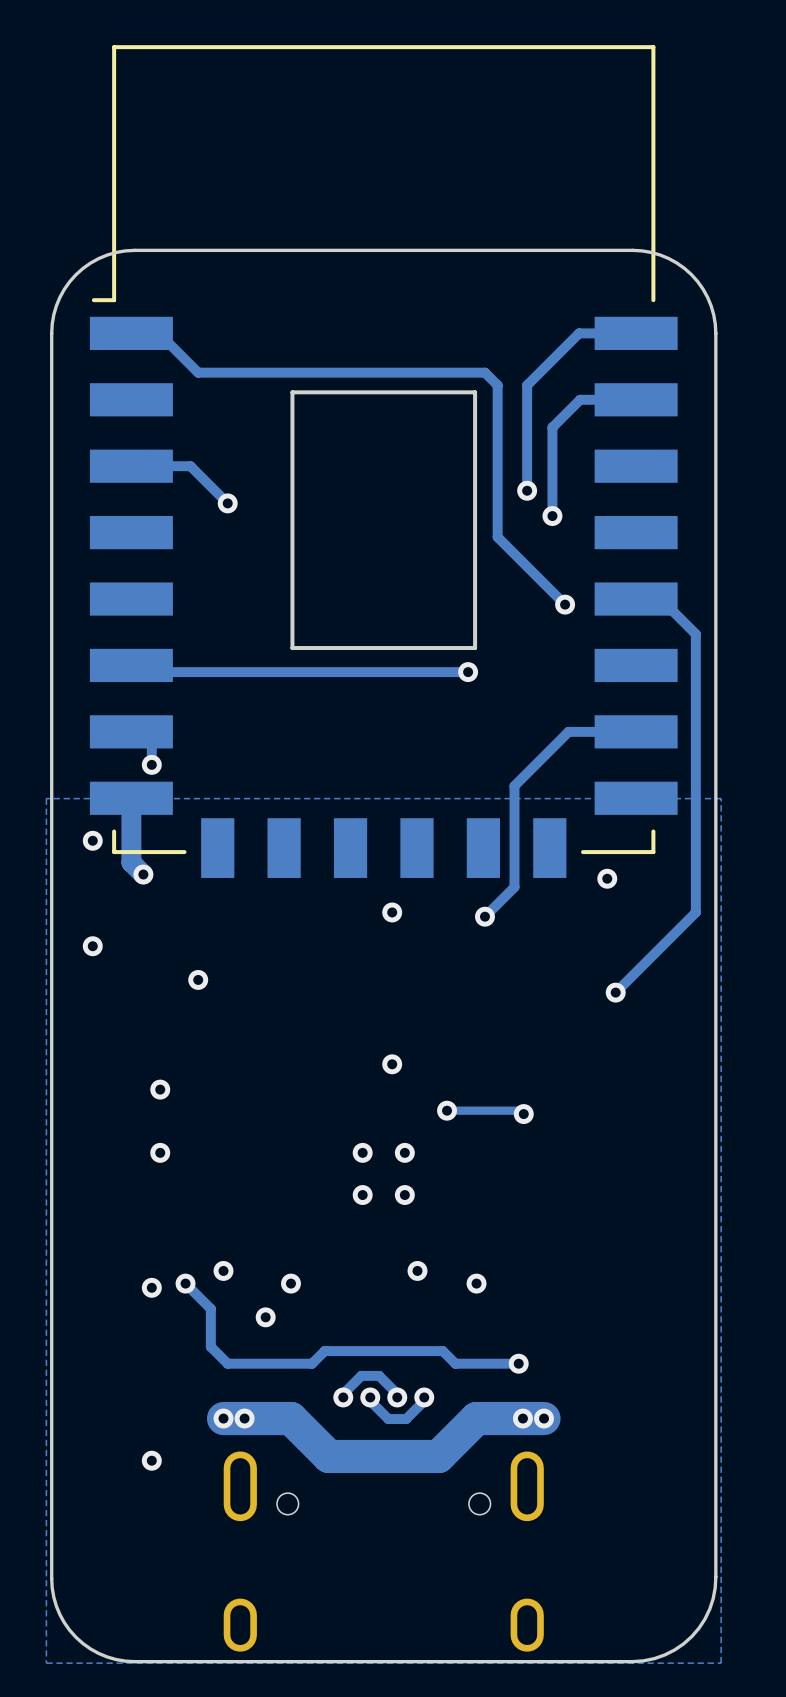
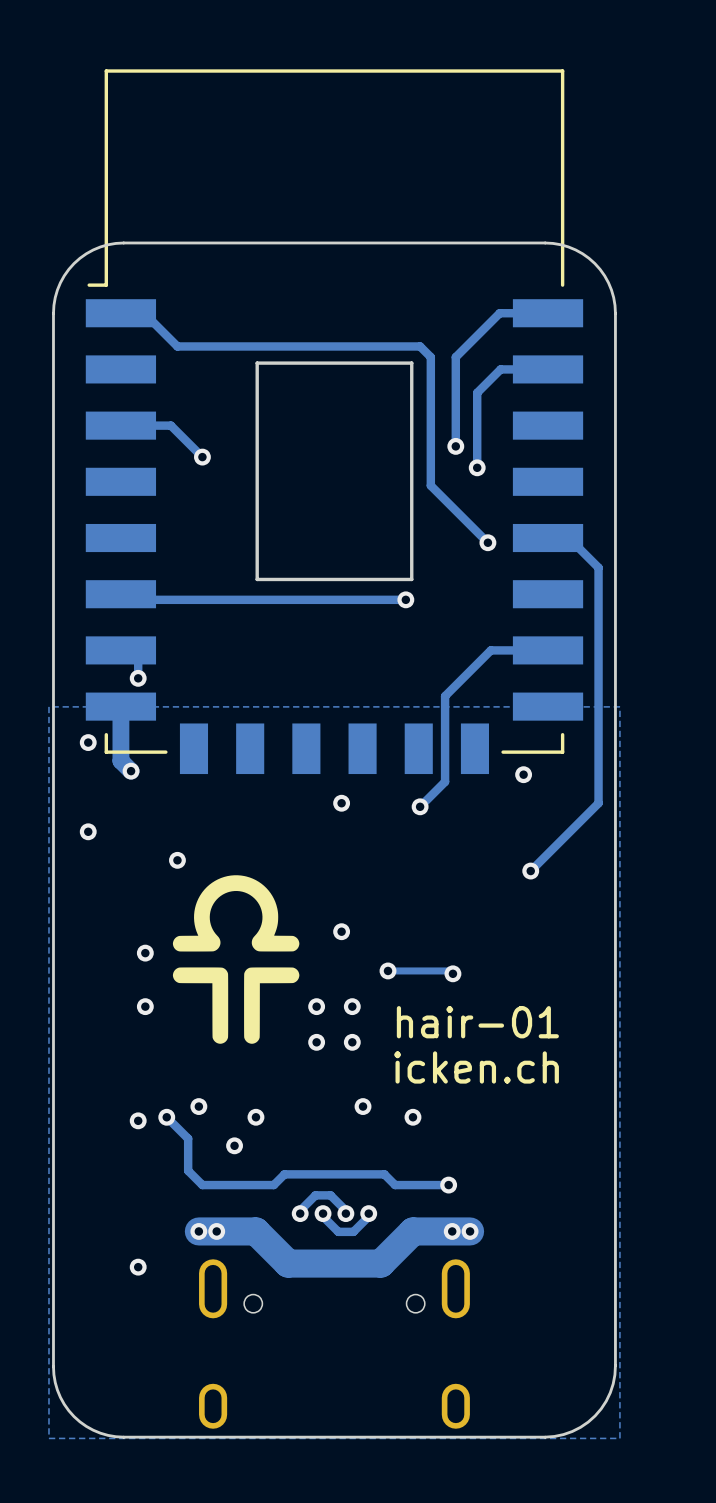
drawing: none -> [172, 875, 300, 1044]
text: none -> hair-01 (477, 1022)
text: none -> icken.ch (476, 1067)

